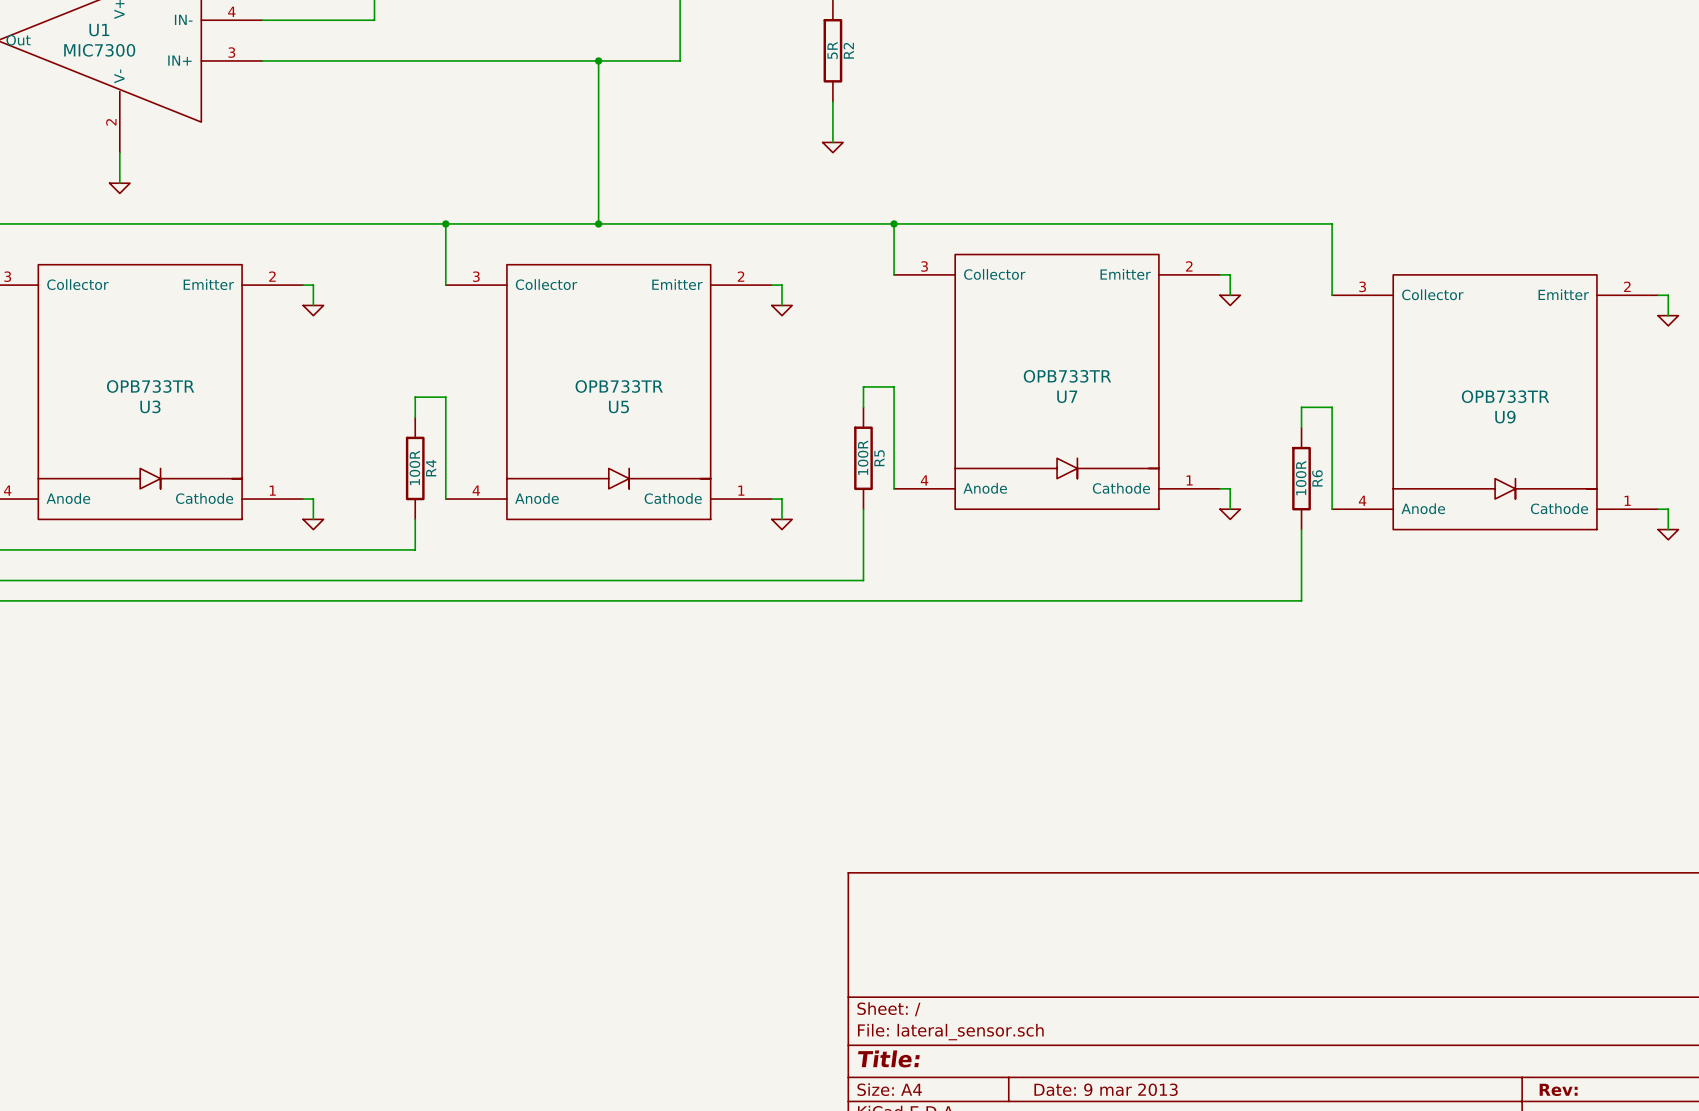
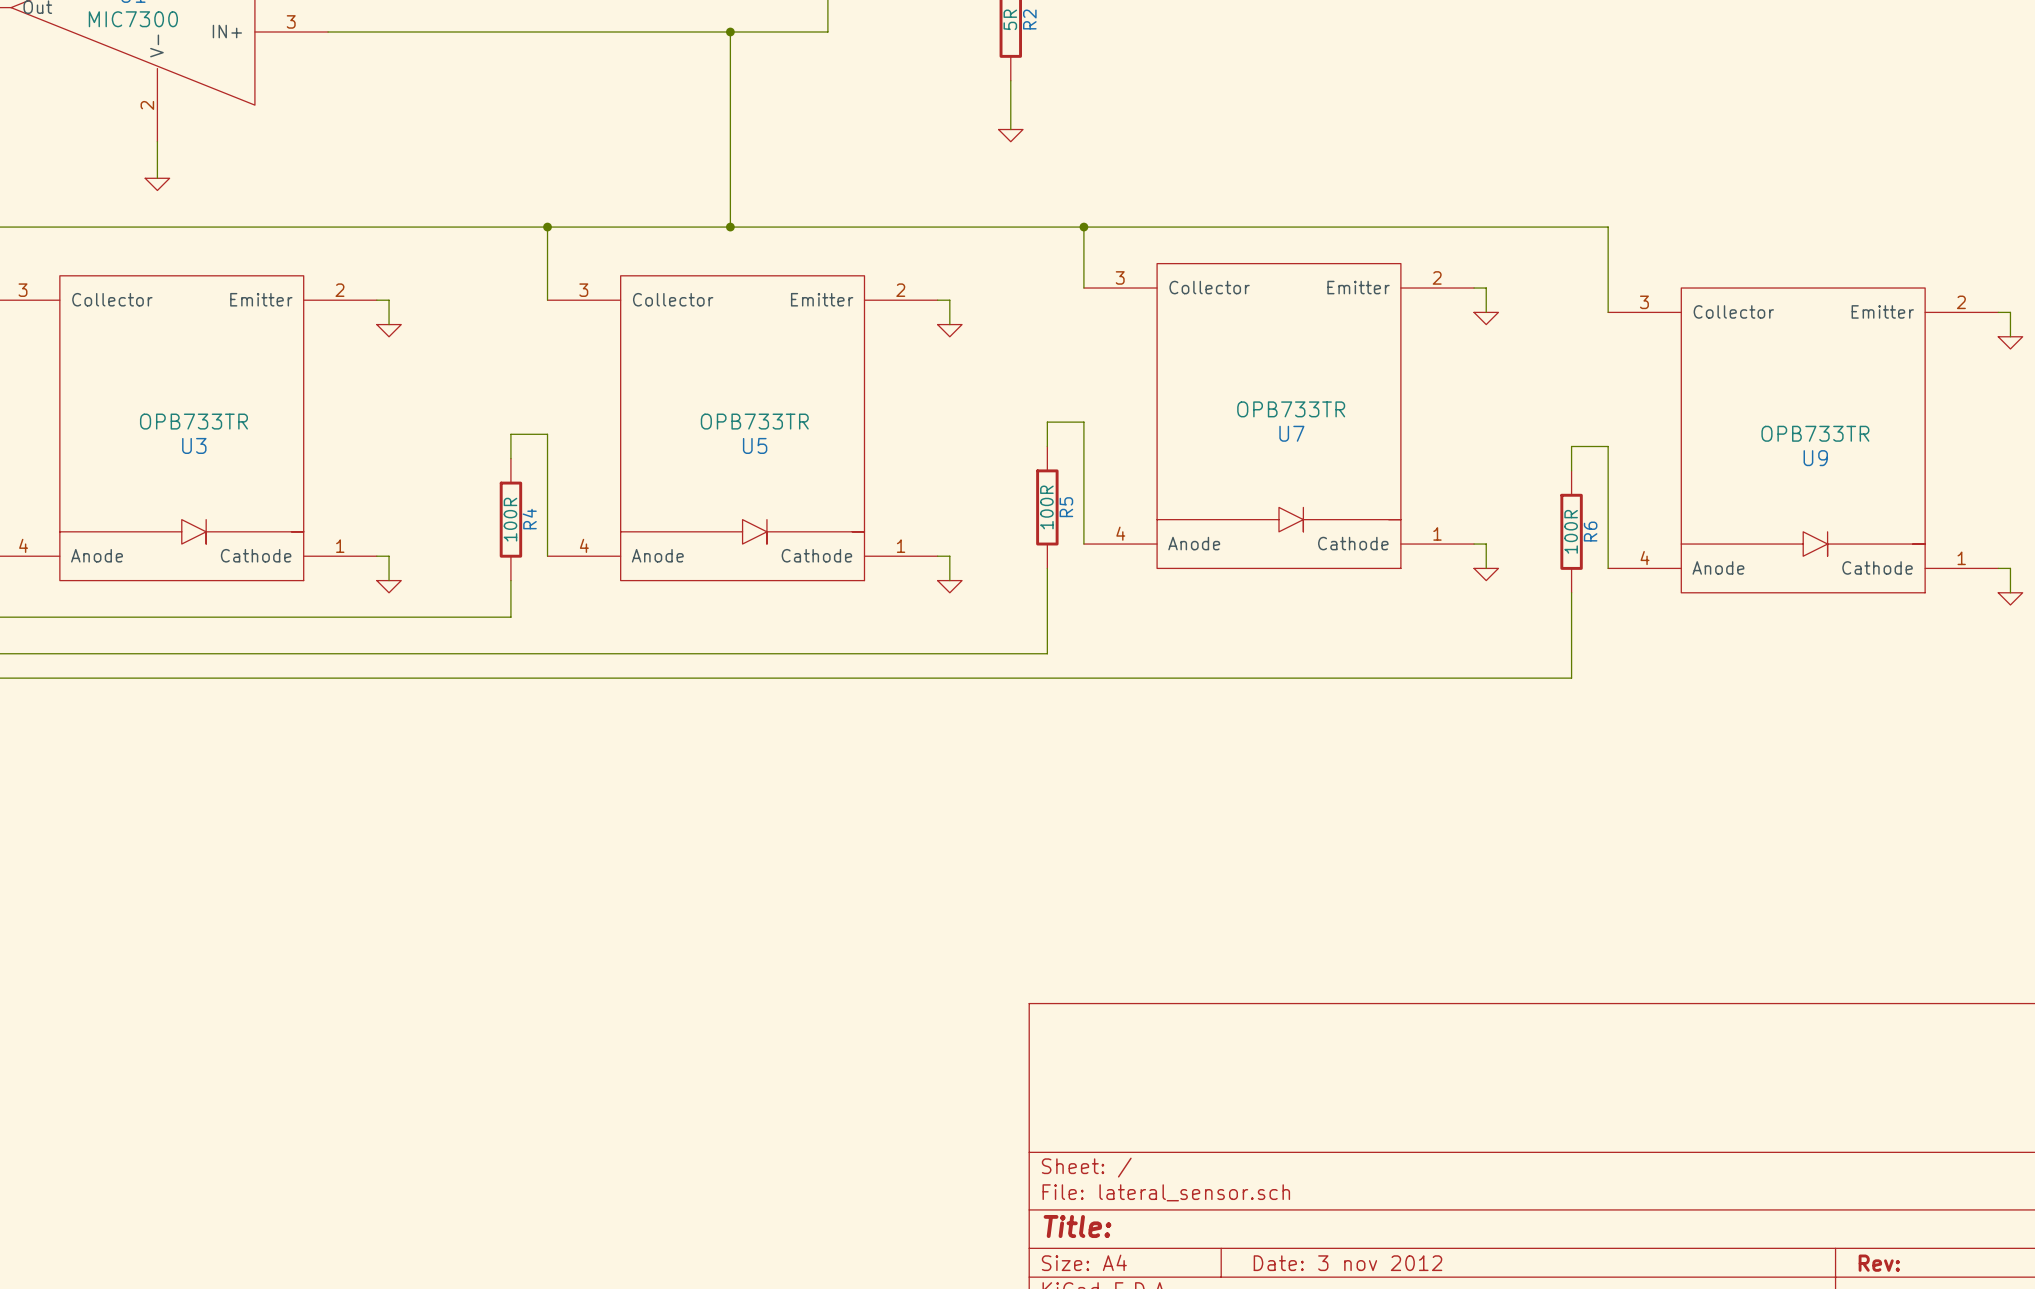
title block: Date: 9 mar 2013 (1106, 1089) -> Date: 3 nov 2012 (1347, 1263)

